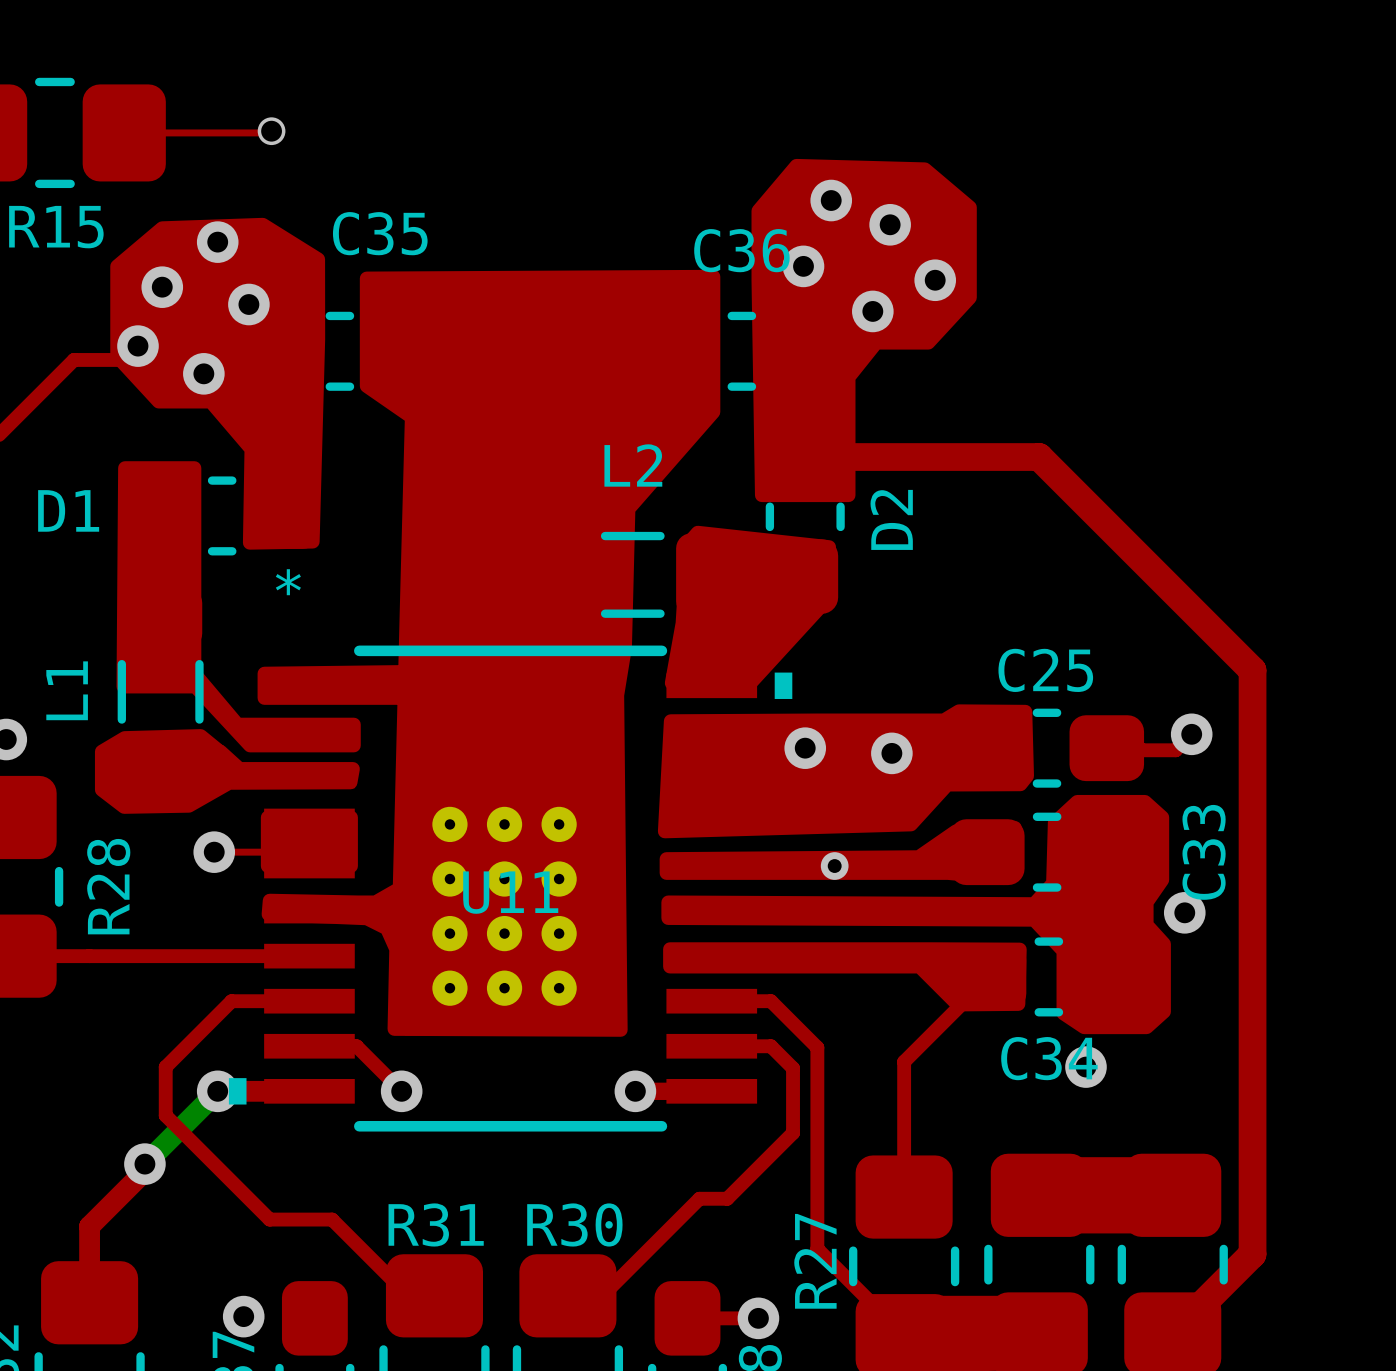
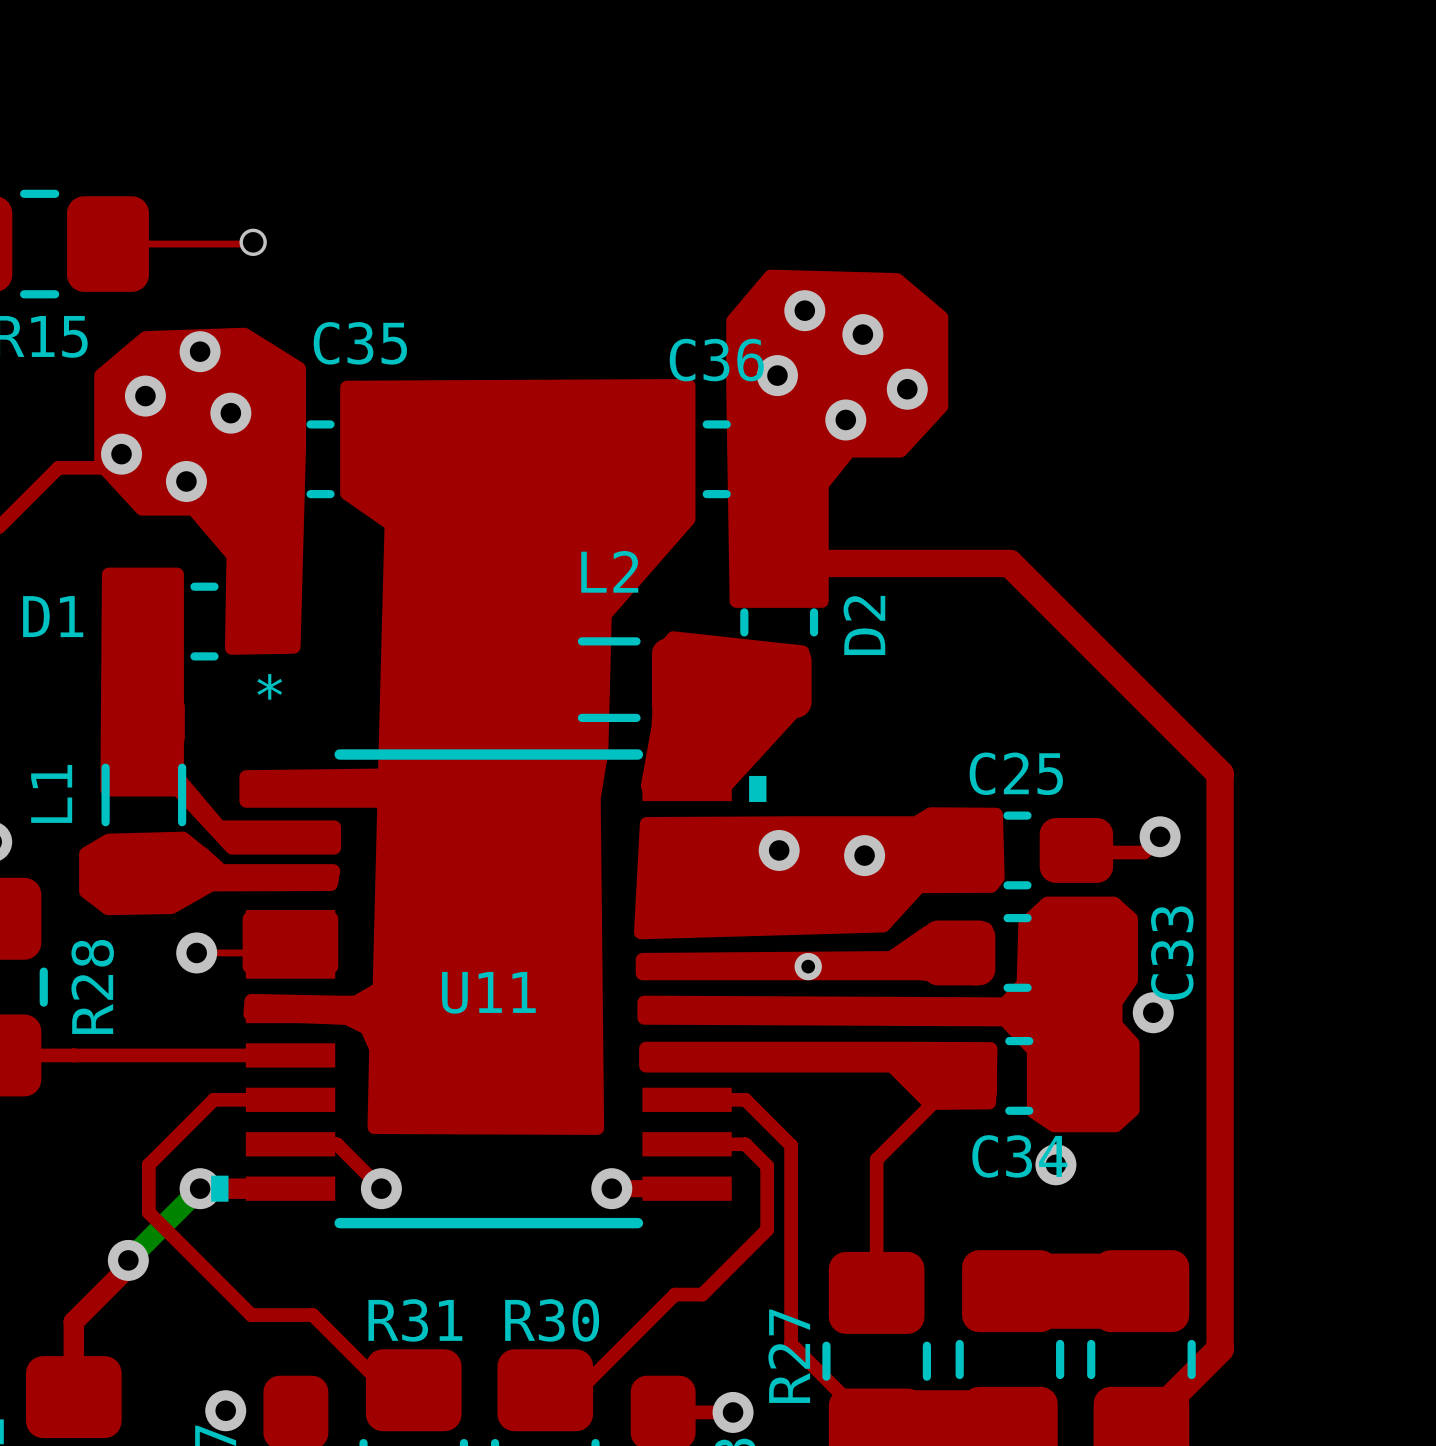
part: (449, 824) -> none
part: (504, 824) -> none
part: (559, 824) -> none
part: (449, 879) -> none
part: (504, 879) -> none
part: (559, 879) -> none
part: (449, 933) -> none
part: (504, 933) -> none
part: (559, 933) -> none
part: (449, 988) -> none
part: (504, 988) -> none
part: (559, 988) -> none

